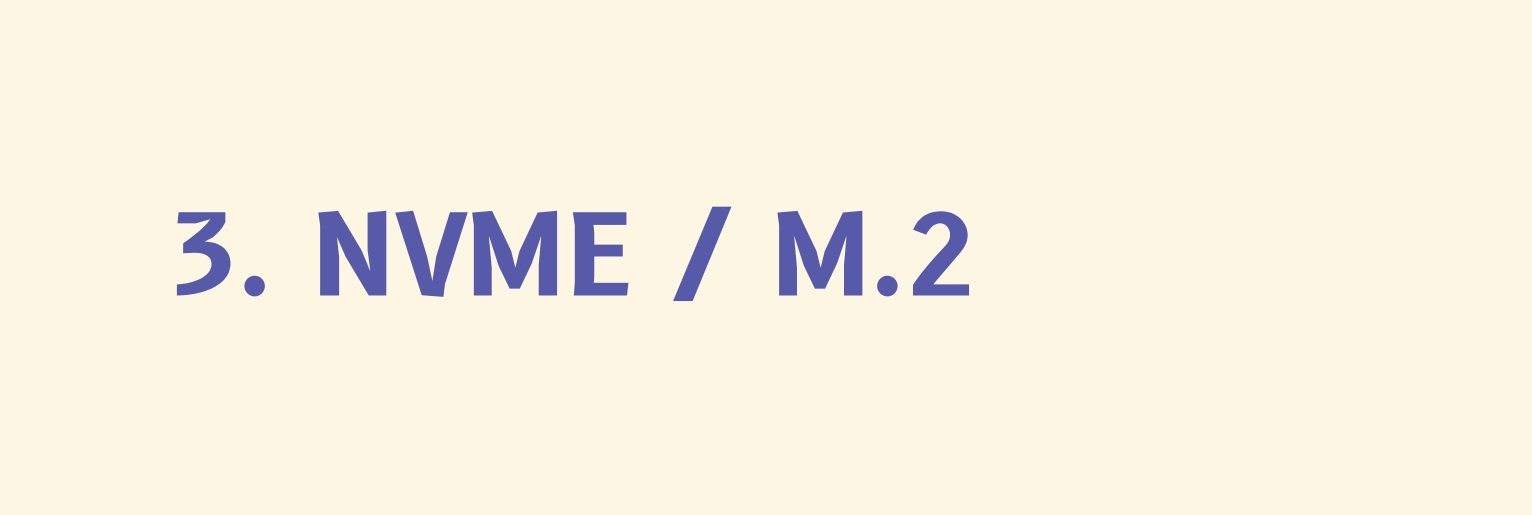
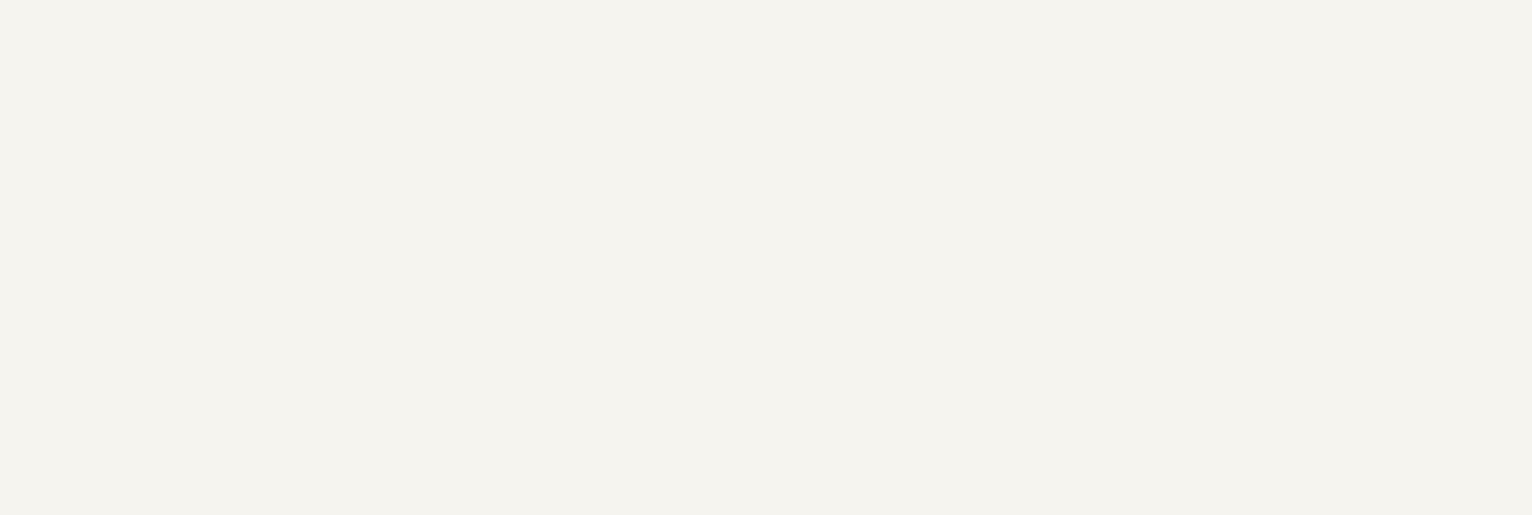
text: 3. NVME / M.2 (572, 253) -> none

